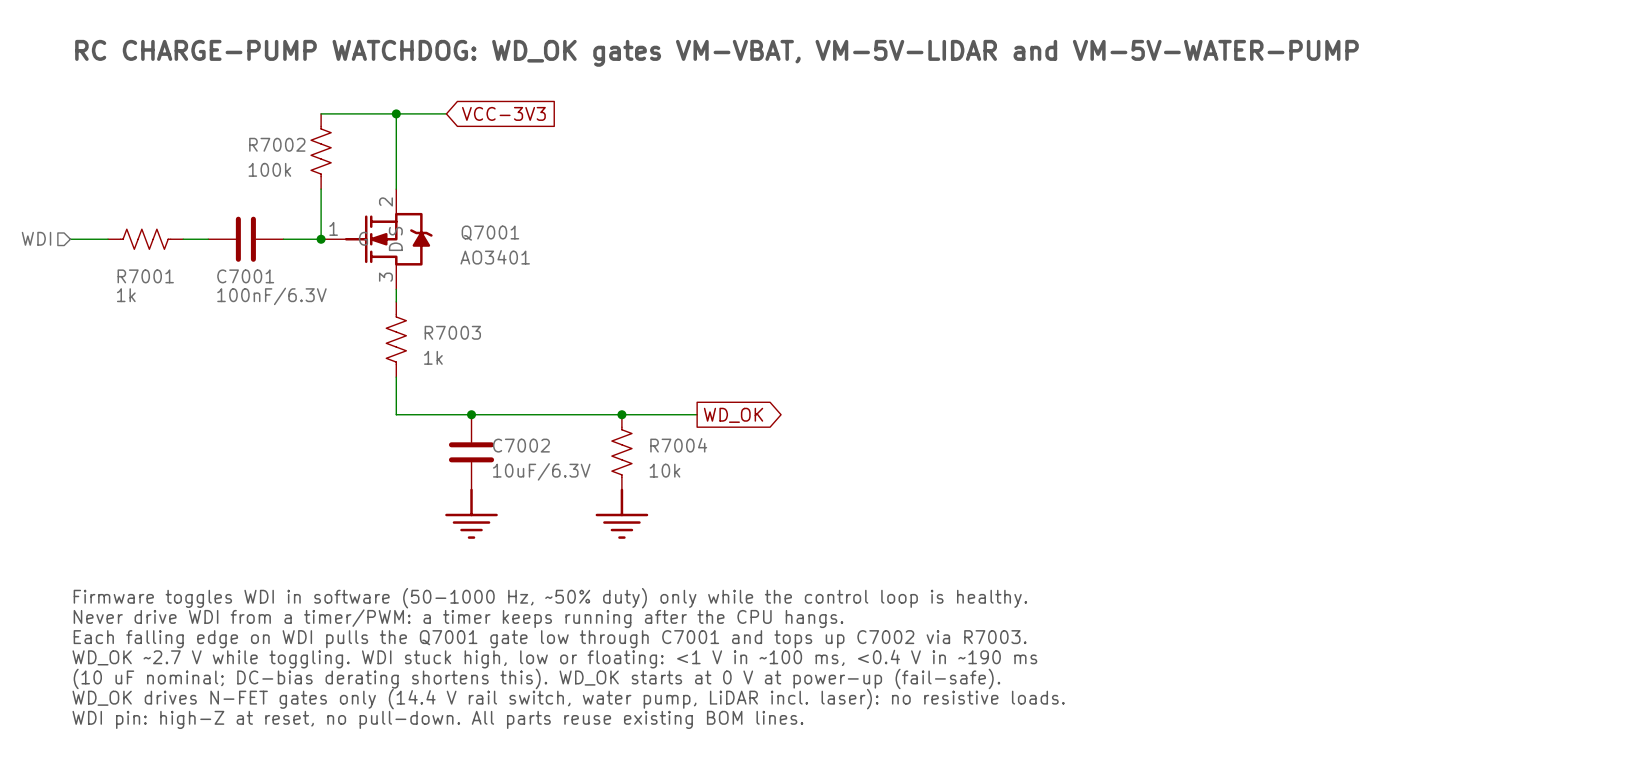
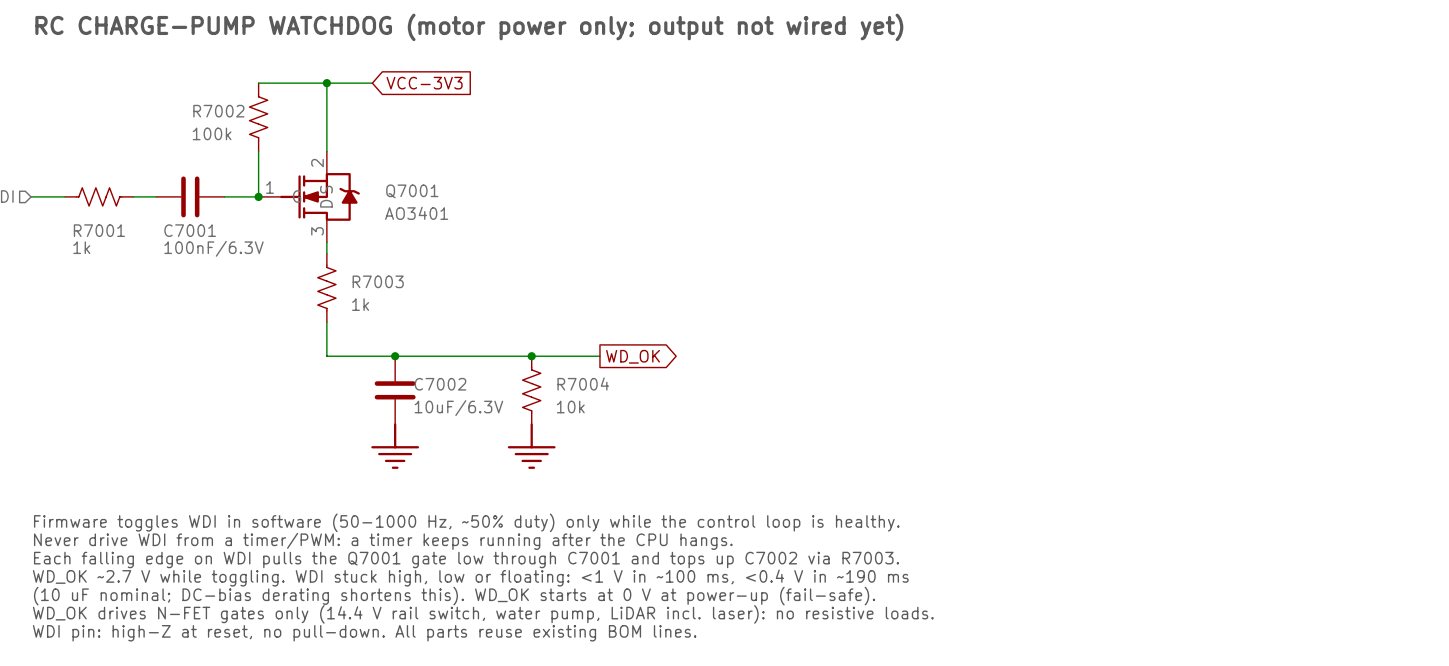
text: RC CHARGE-PUMP WATCHDOG: WD_OK gates VM-VBAT, VM-5V-LIDAR and VM-5V-WATER-PUMP (716, 53) -> RC CHARGE-PUMP WATCHDOG (motor power only; output not wired yet) (469, 27)

